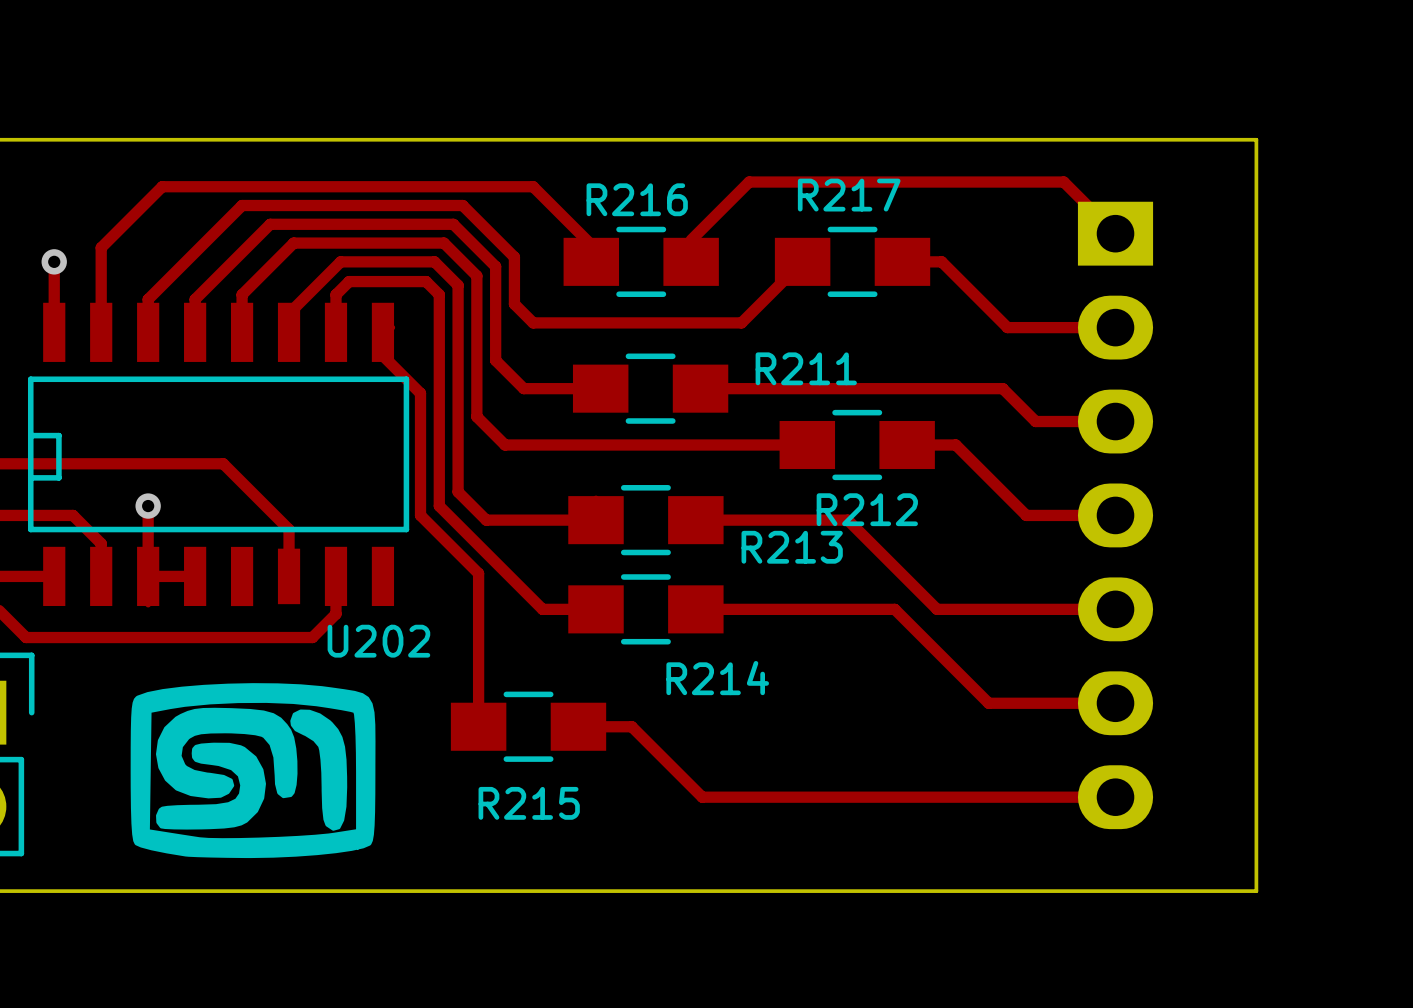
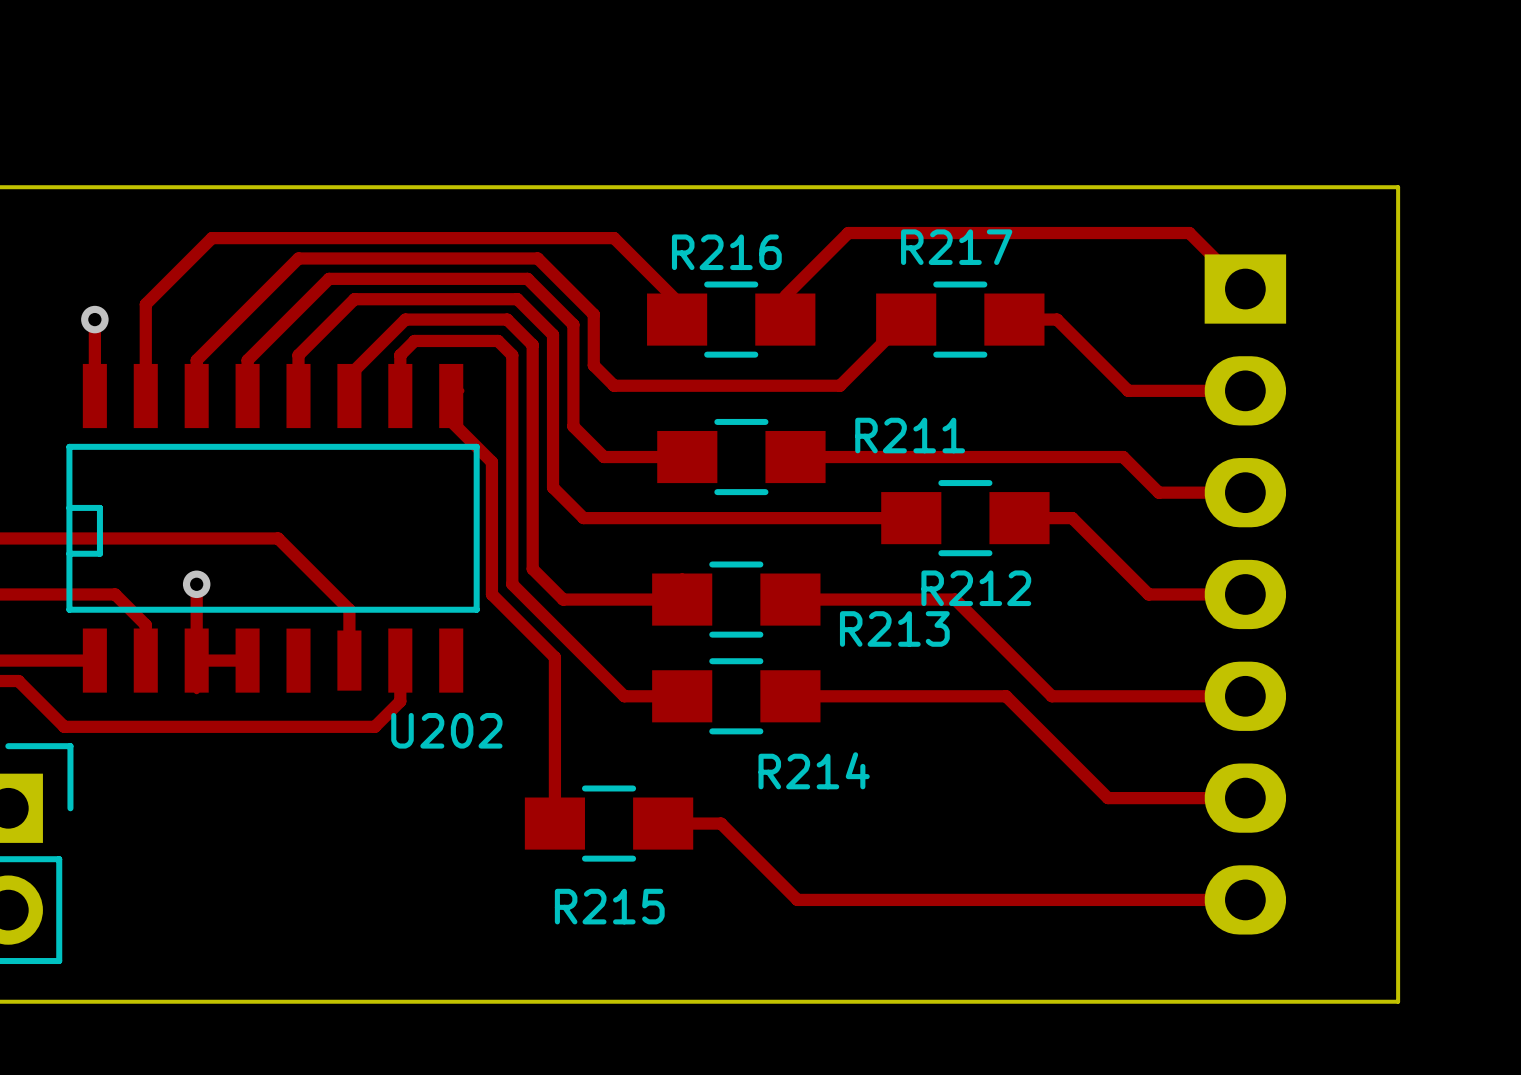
drawing: [130, 683, 376, 859] -> none

